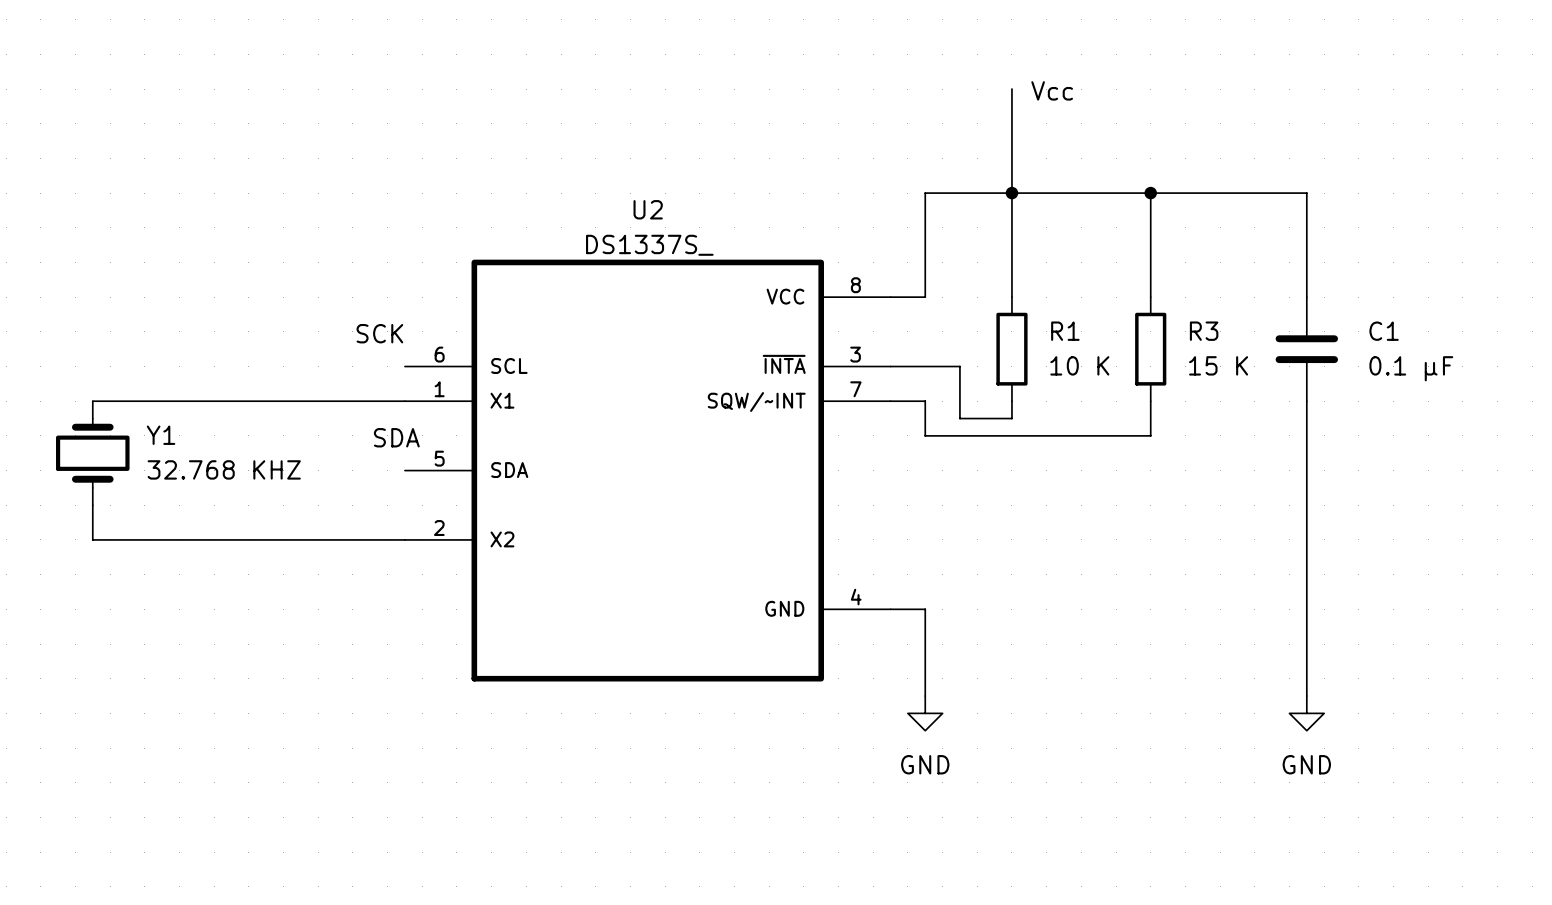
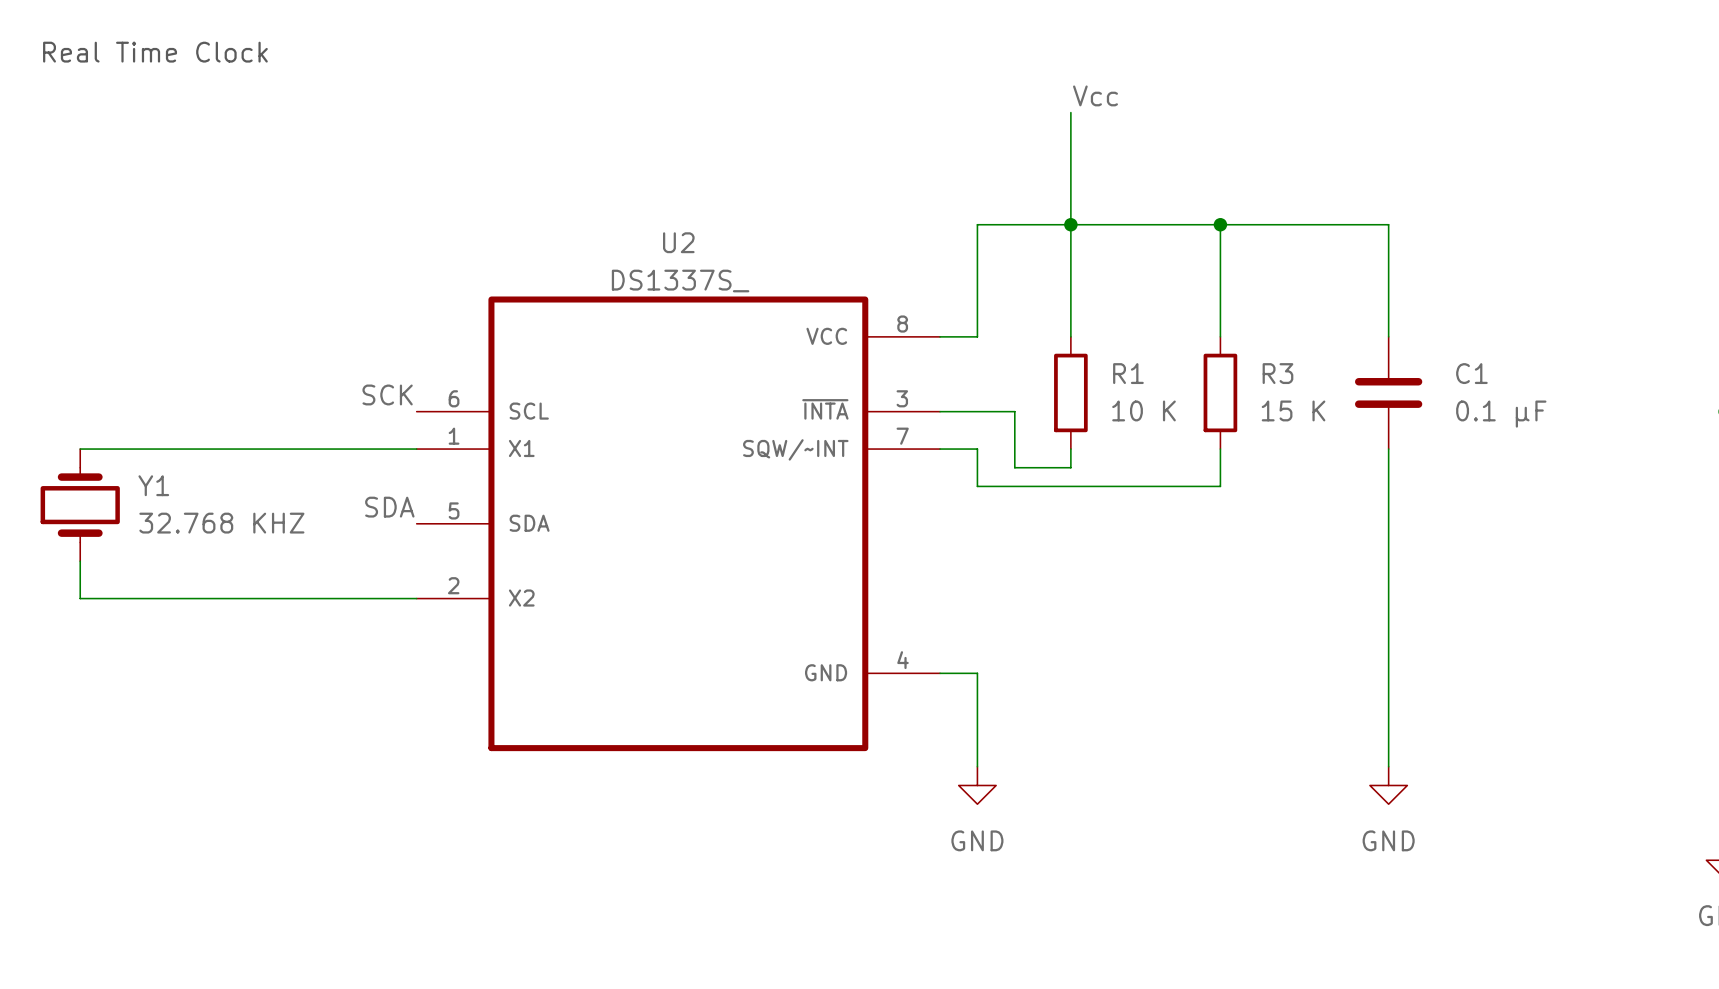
text: none -> Real Time Clock (155, 52)
label position: Vcc (1052, 90) -> Vcc (1095, 95)
label position: SCK (379, 333) -> SCK (387, 394)
label position: SDA (396, 437) -> SDA (389, 507)

